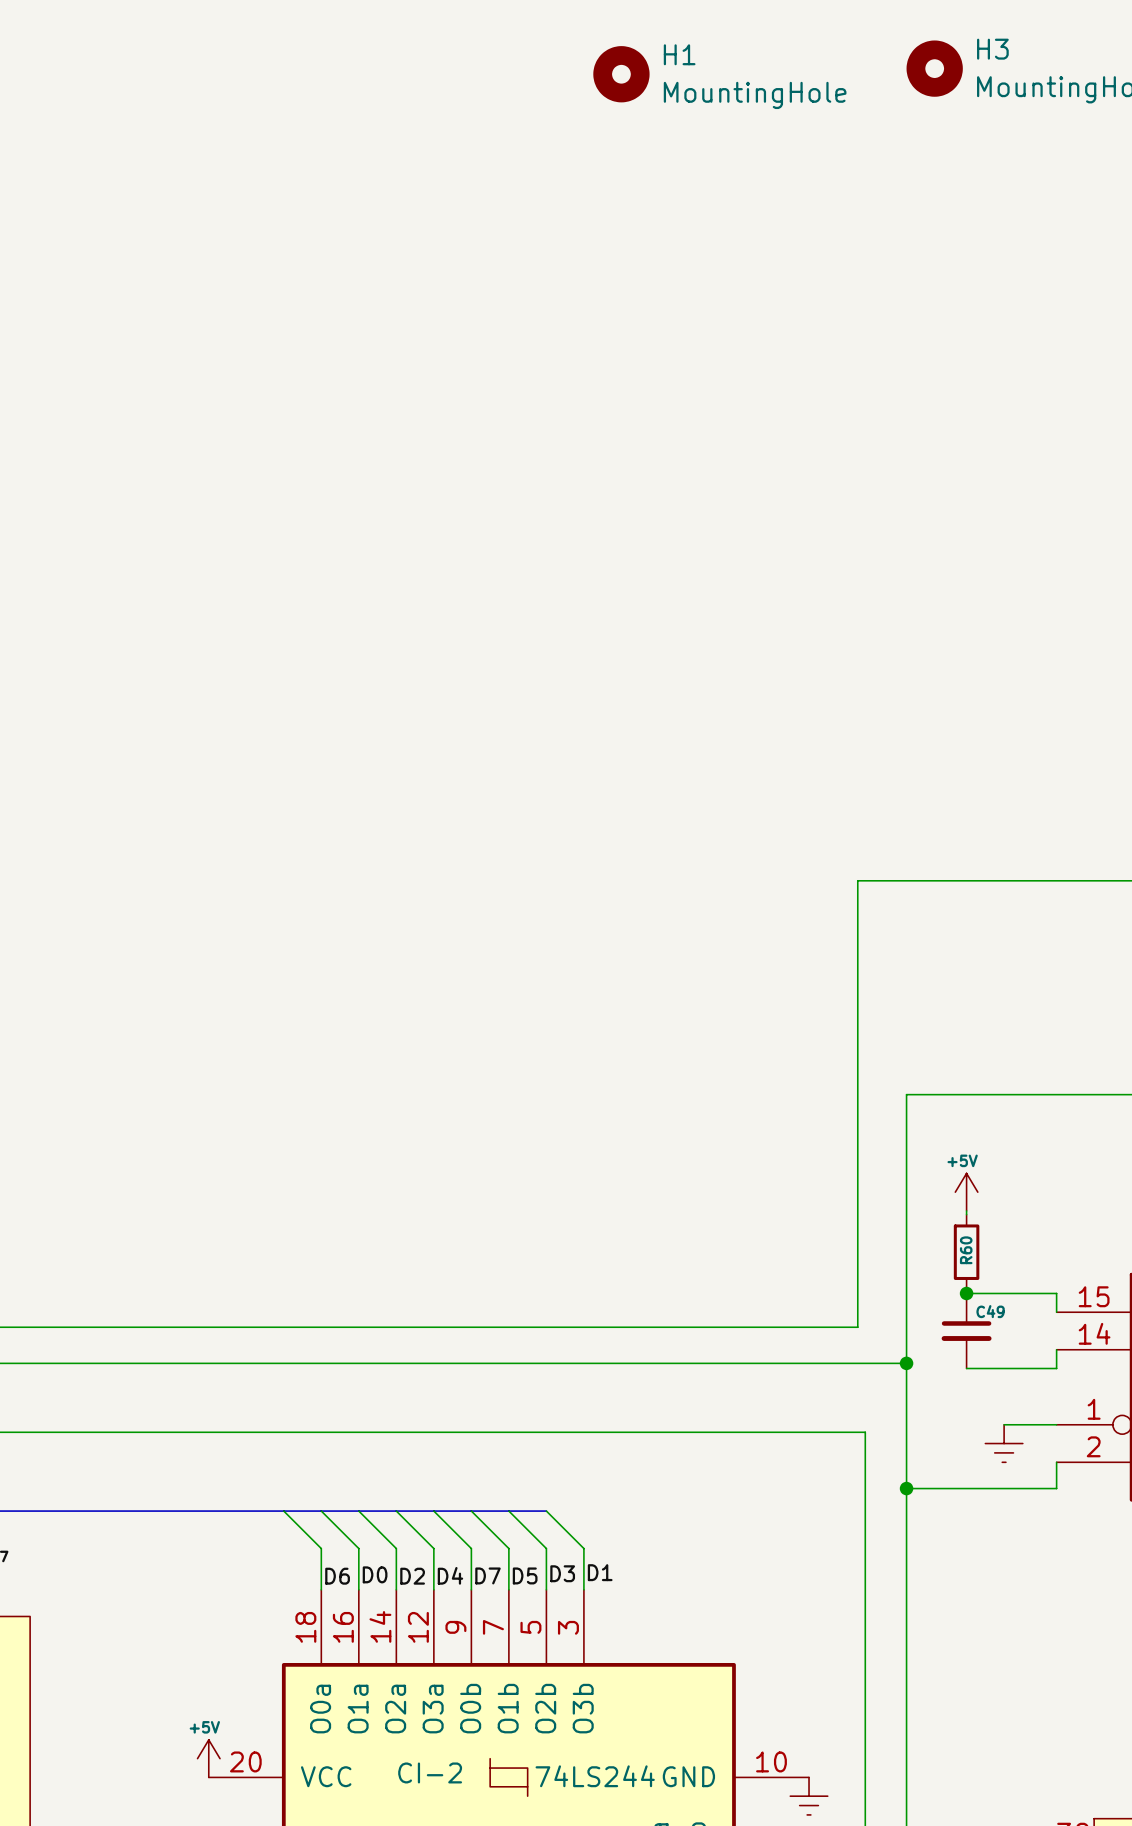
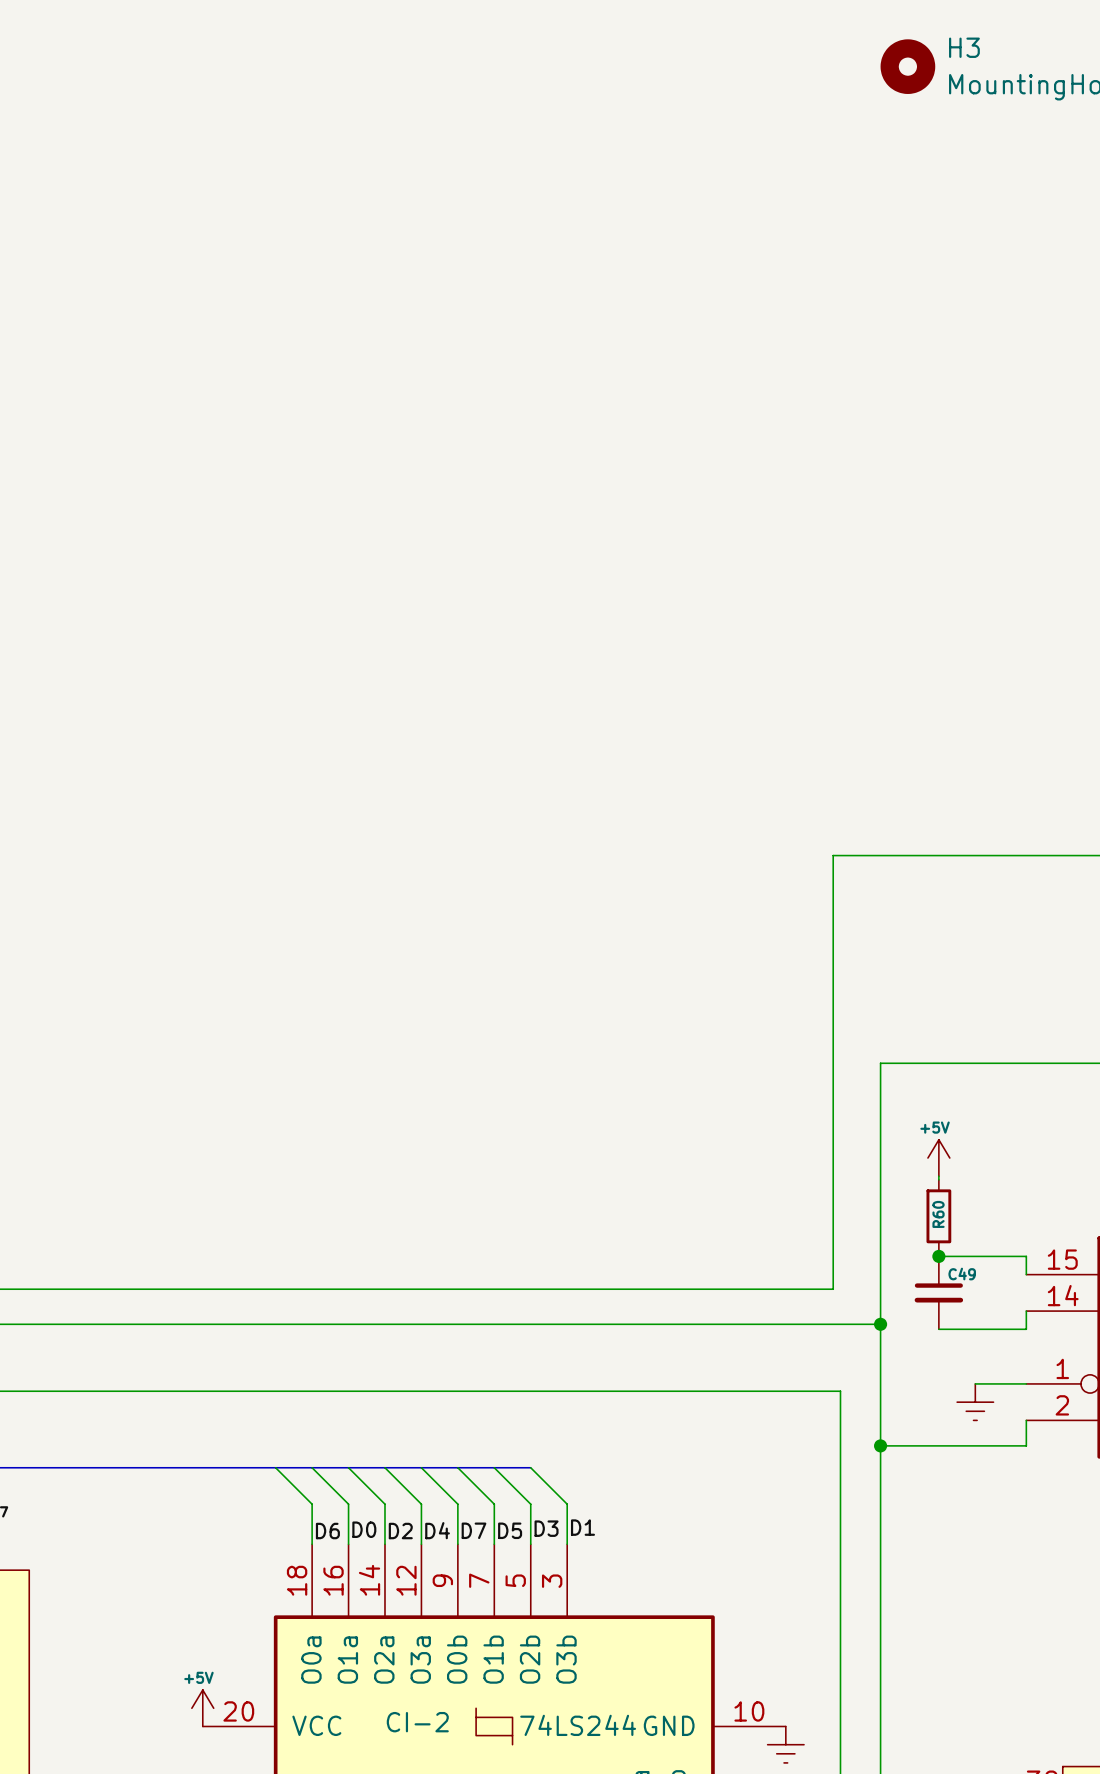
H1: MountingHole (621, 74) -> none

